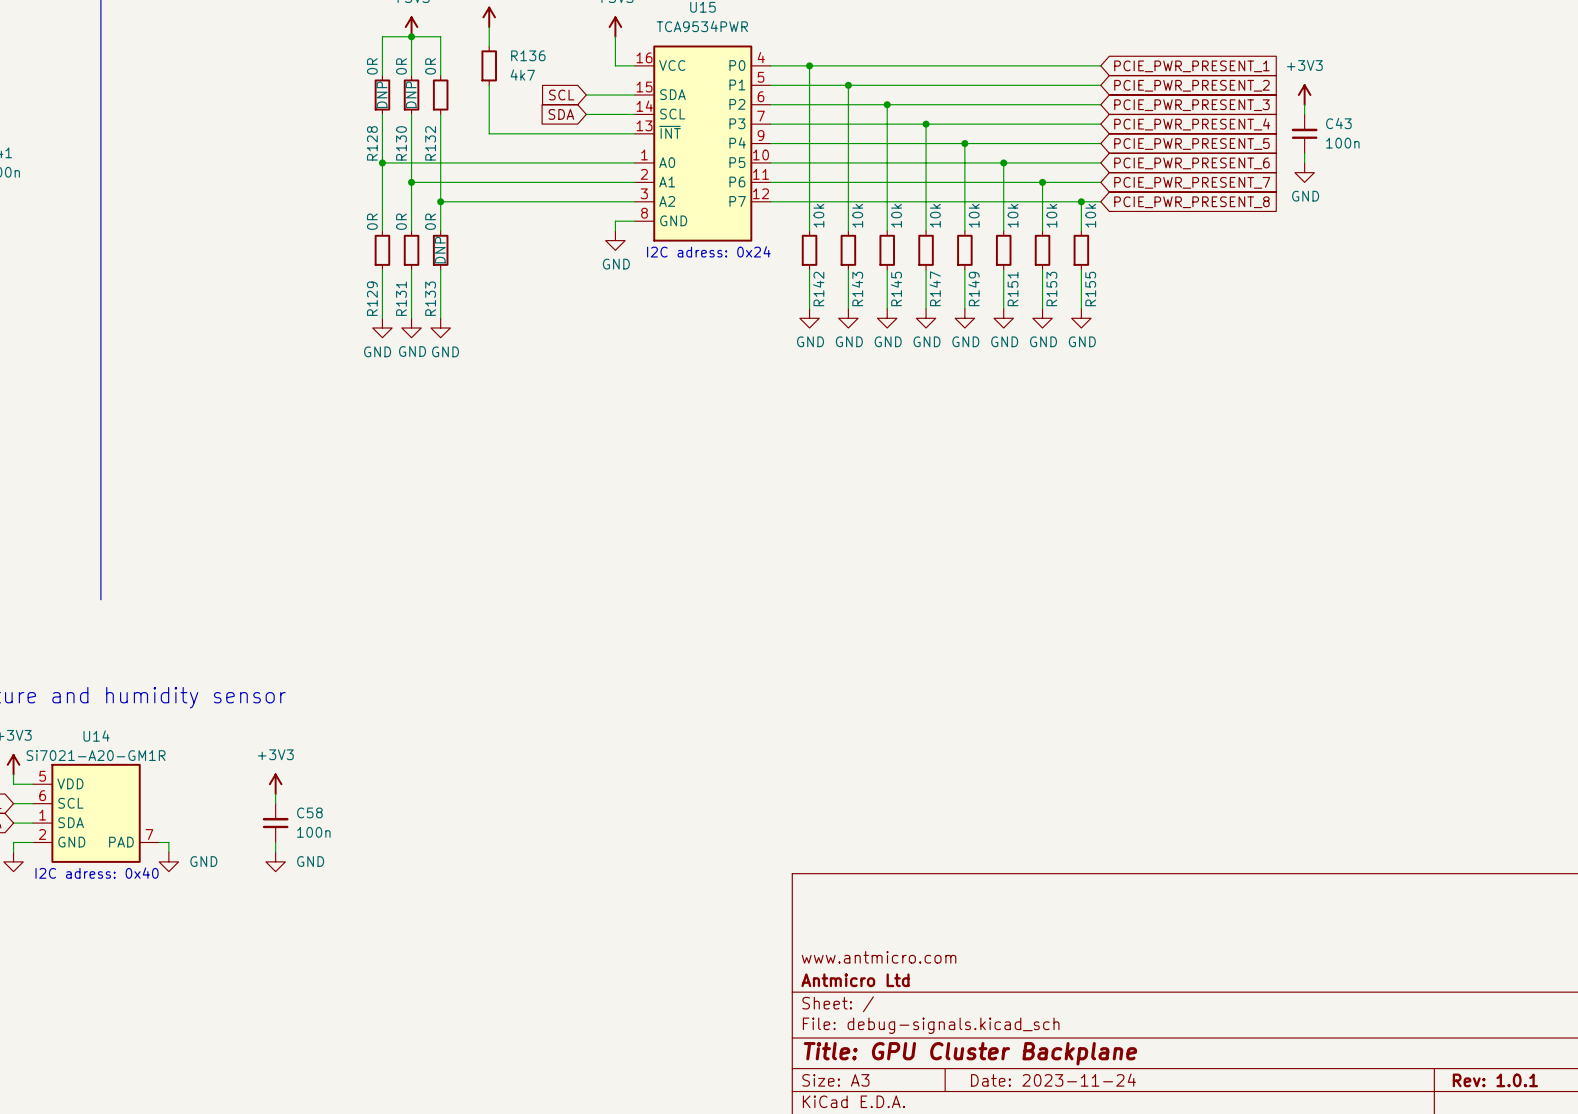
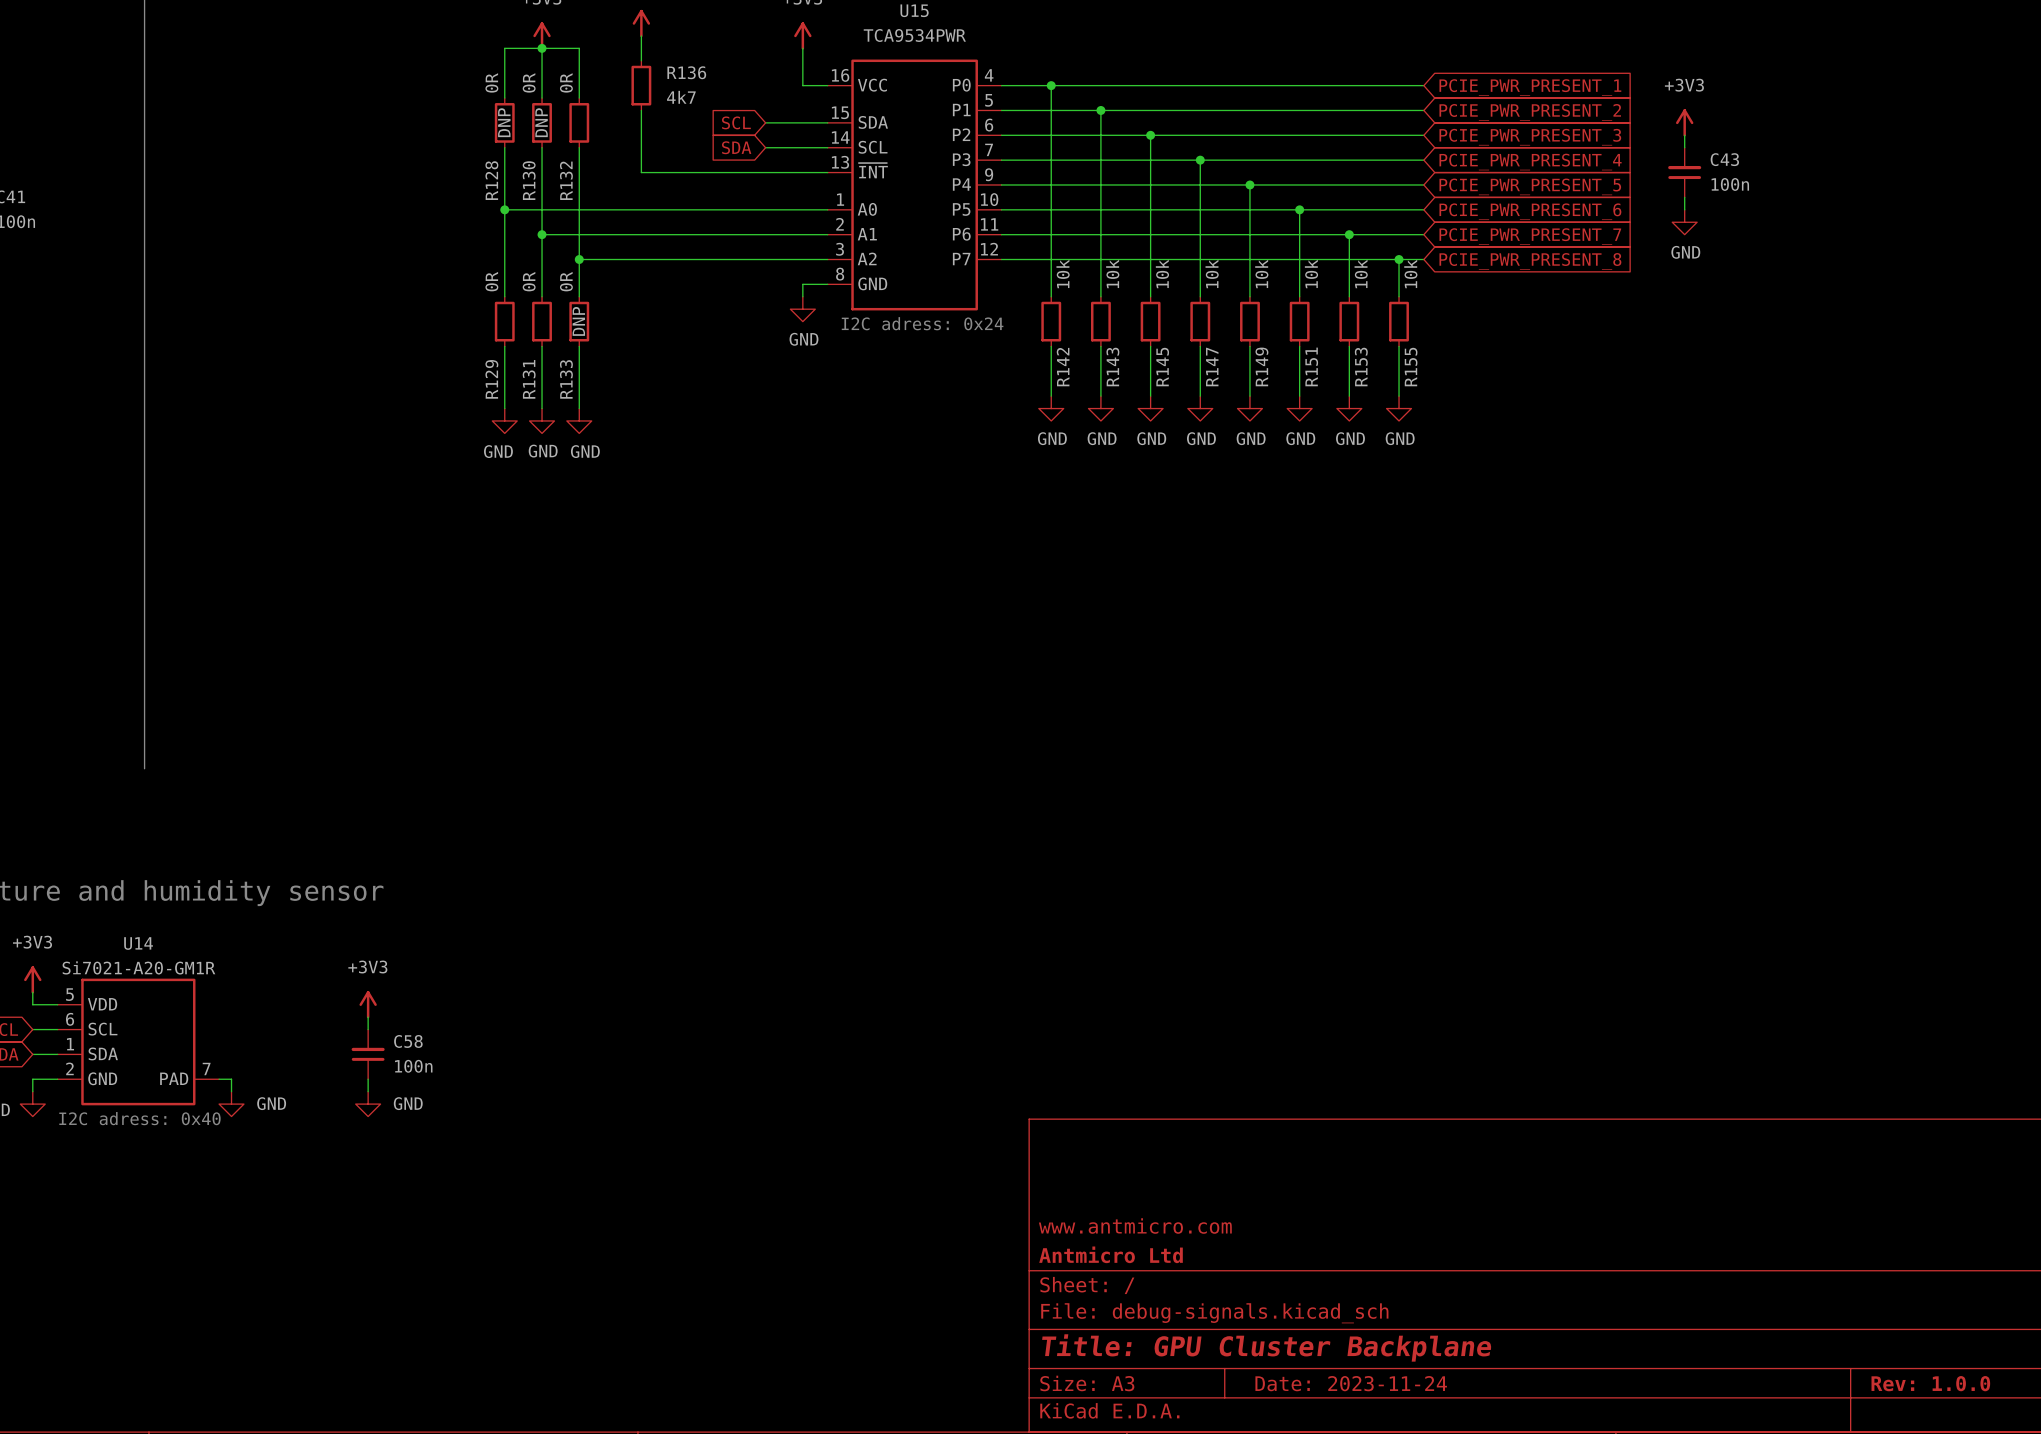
title block: Rev: 1.0.1 (1495, 1080) -> Rev: 1.0.0 (1930, 1383)

